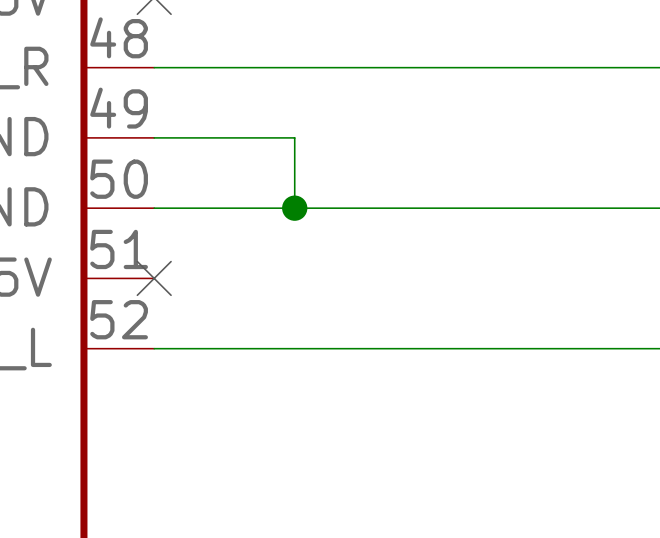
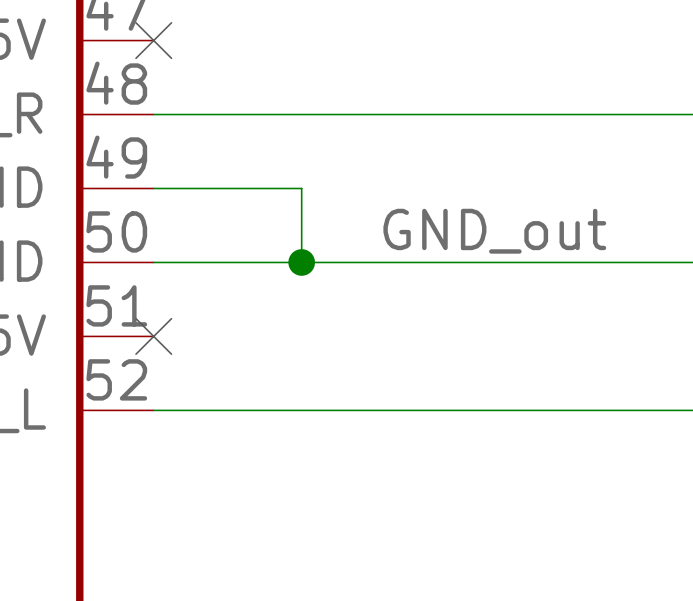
label: none -> GND_out (494, 231)

